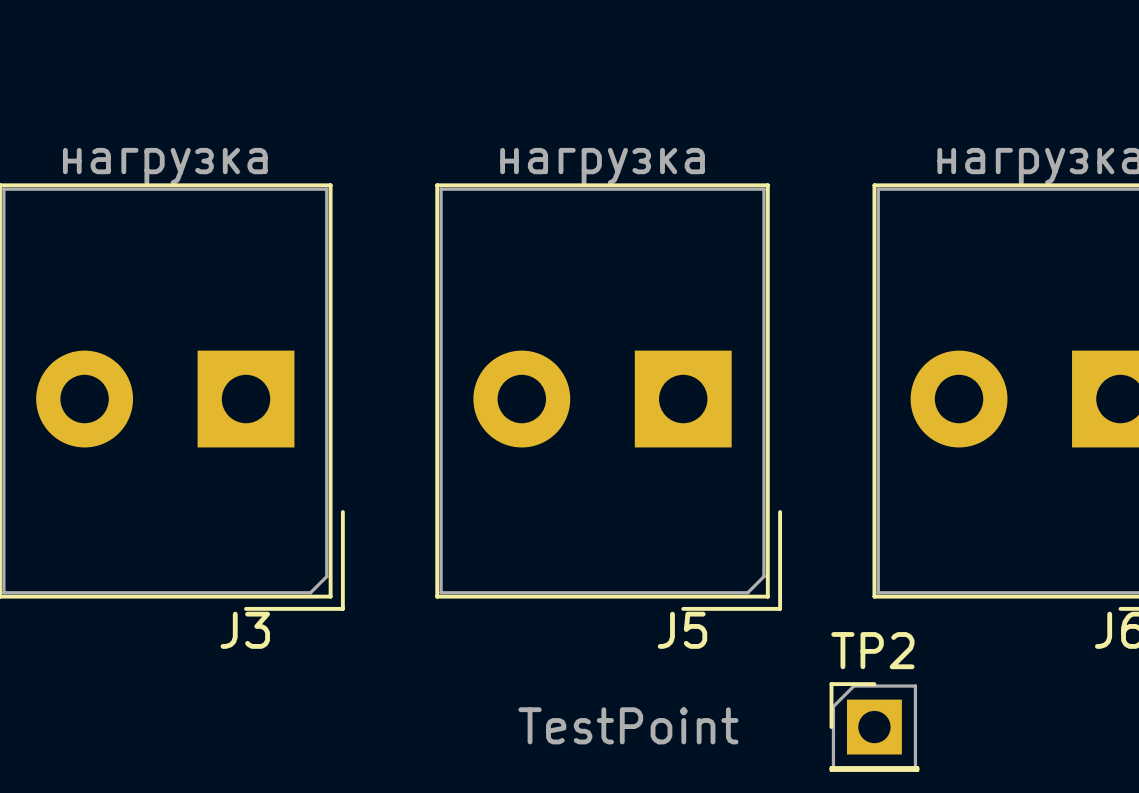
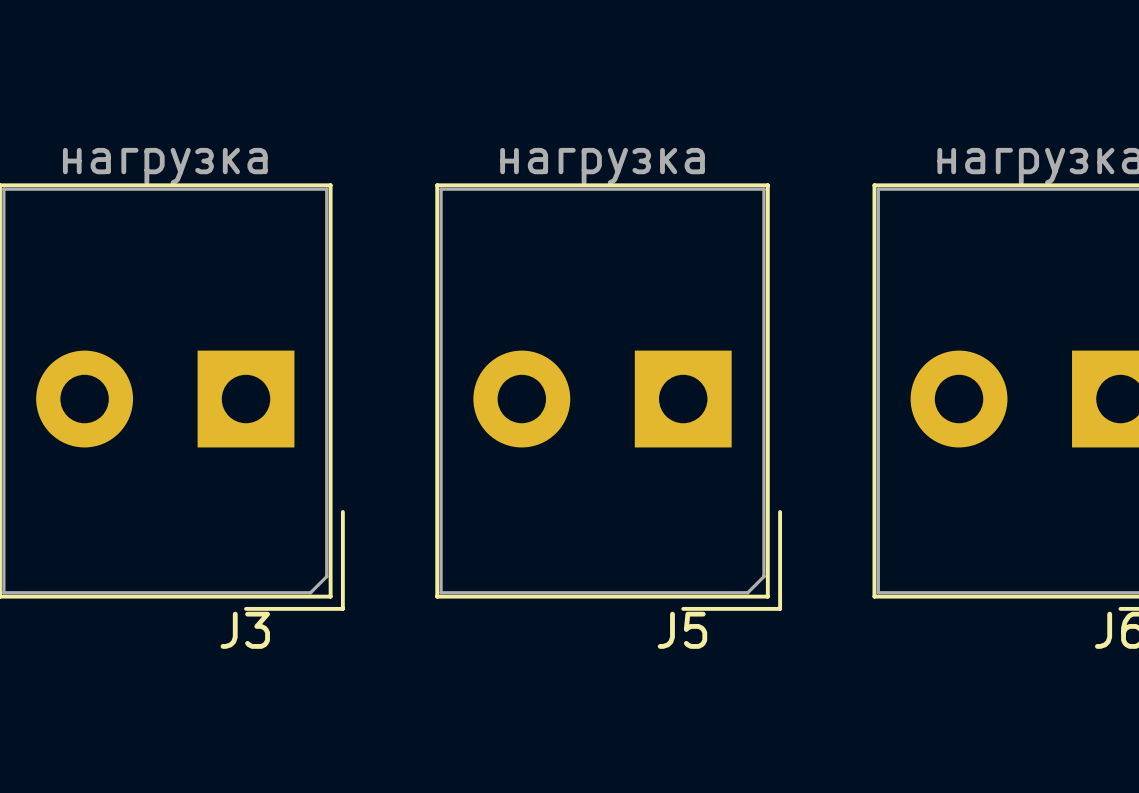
TP2: TestPoint (874, 727) -> none

